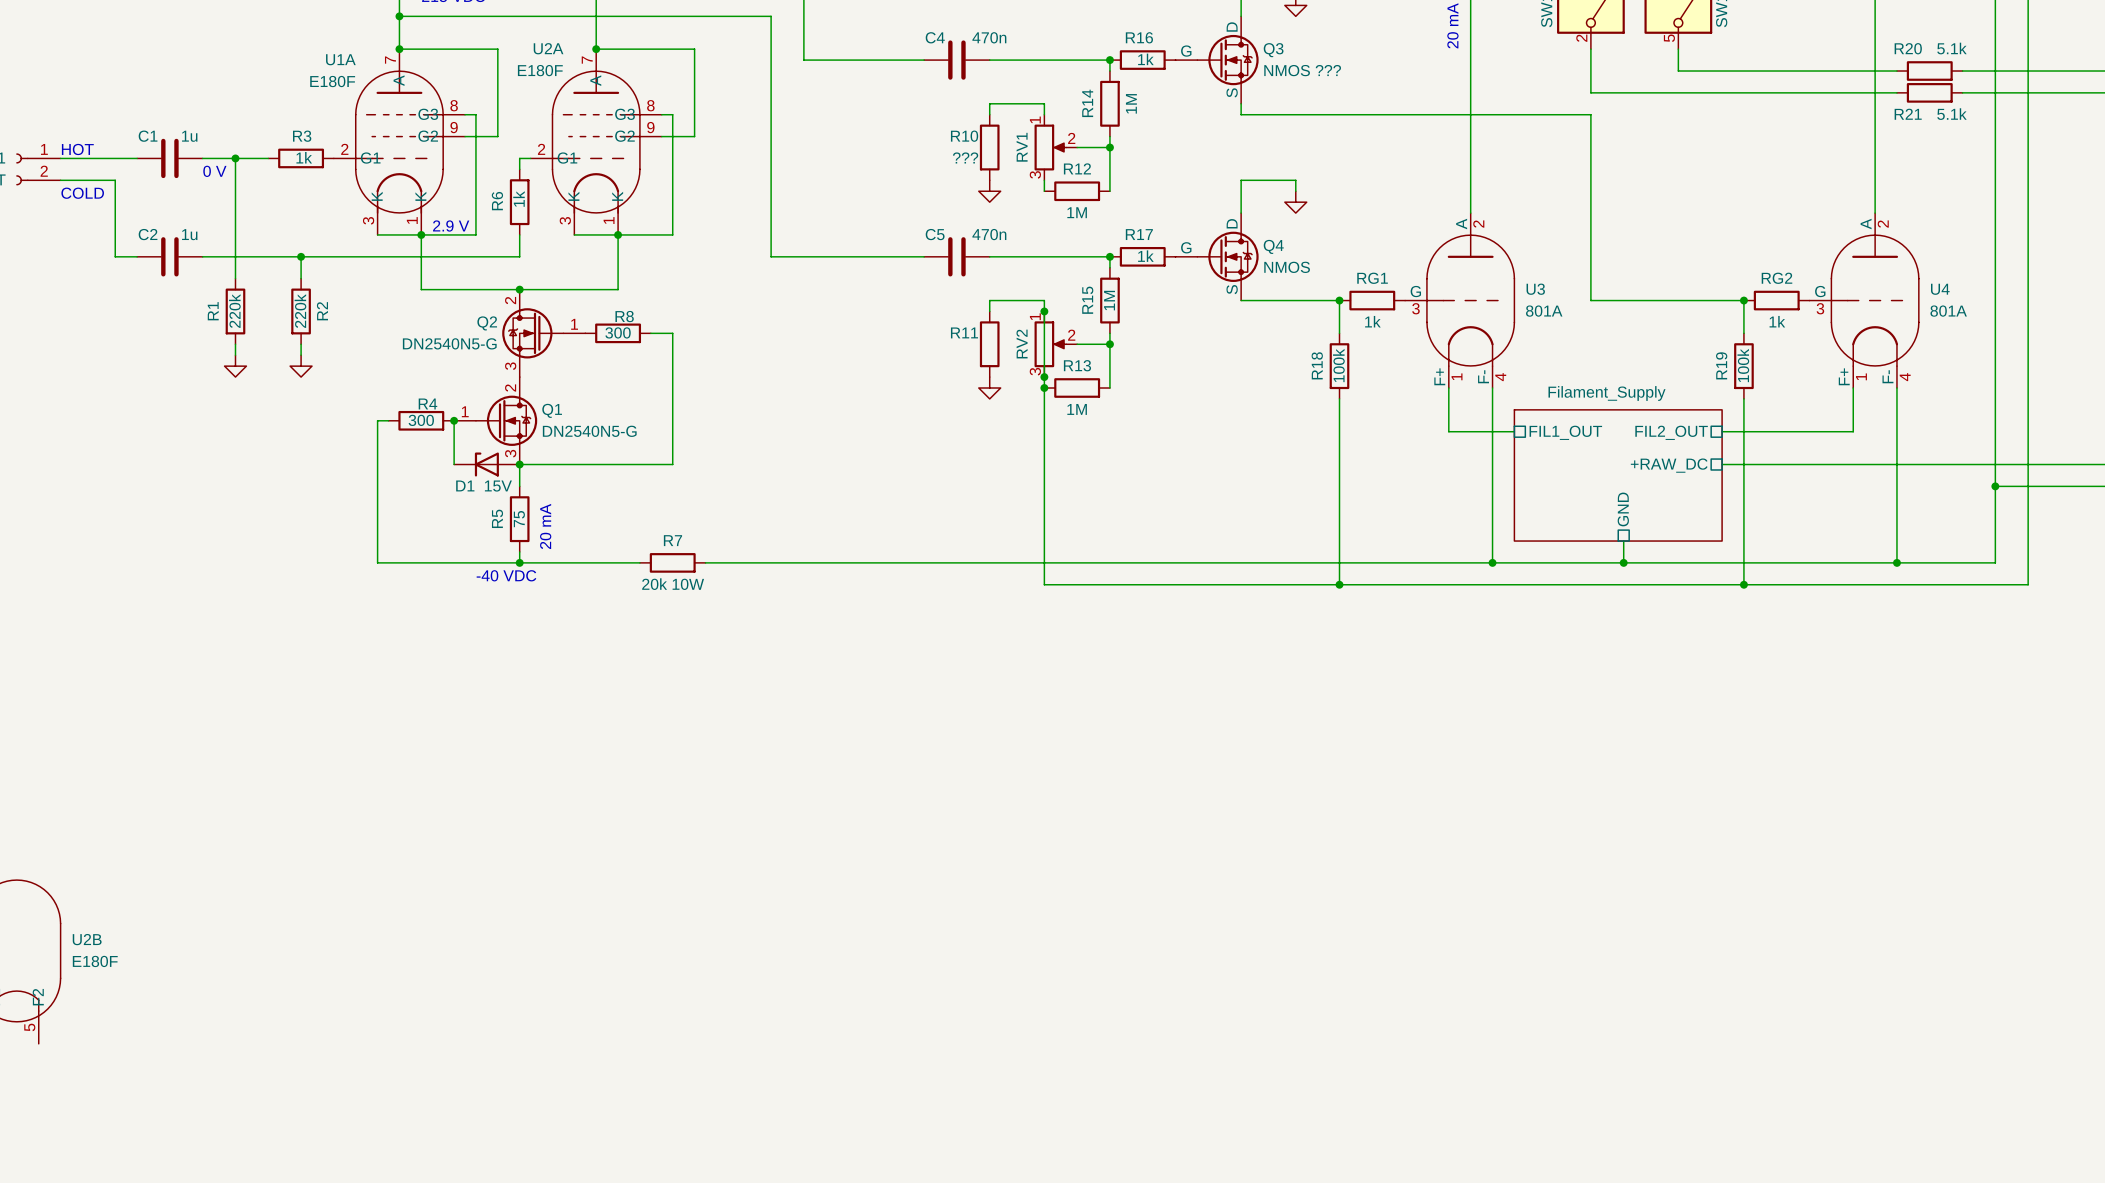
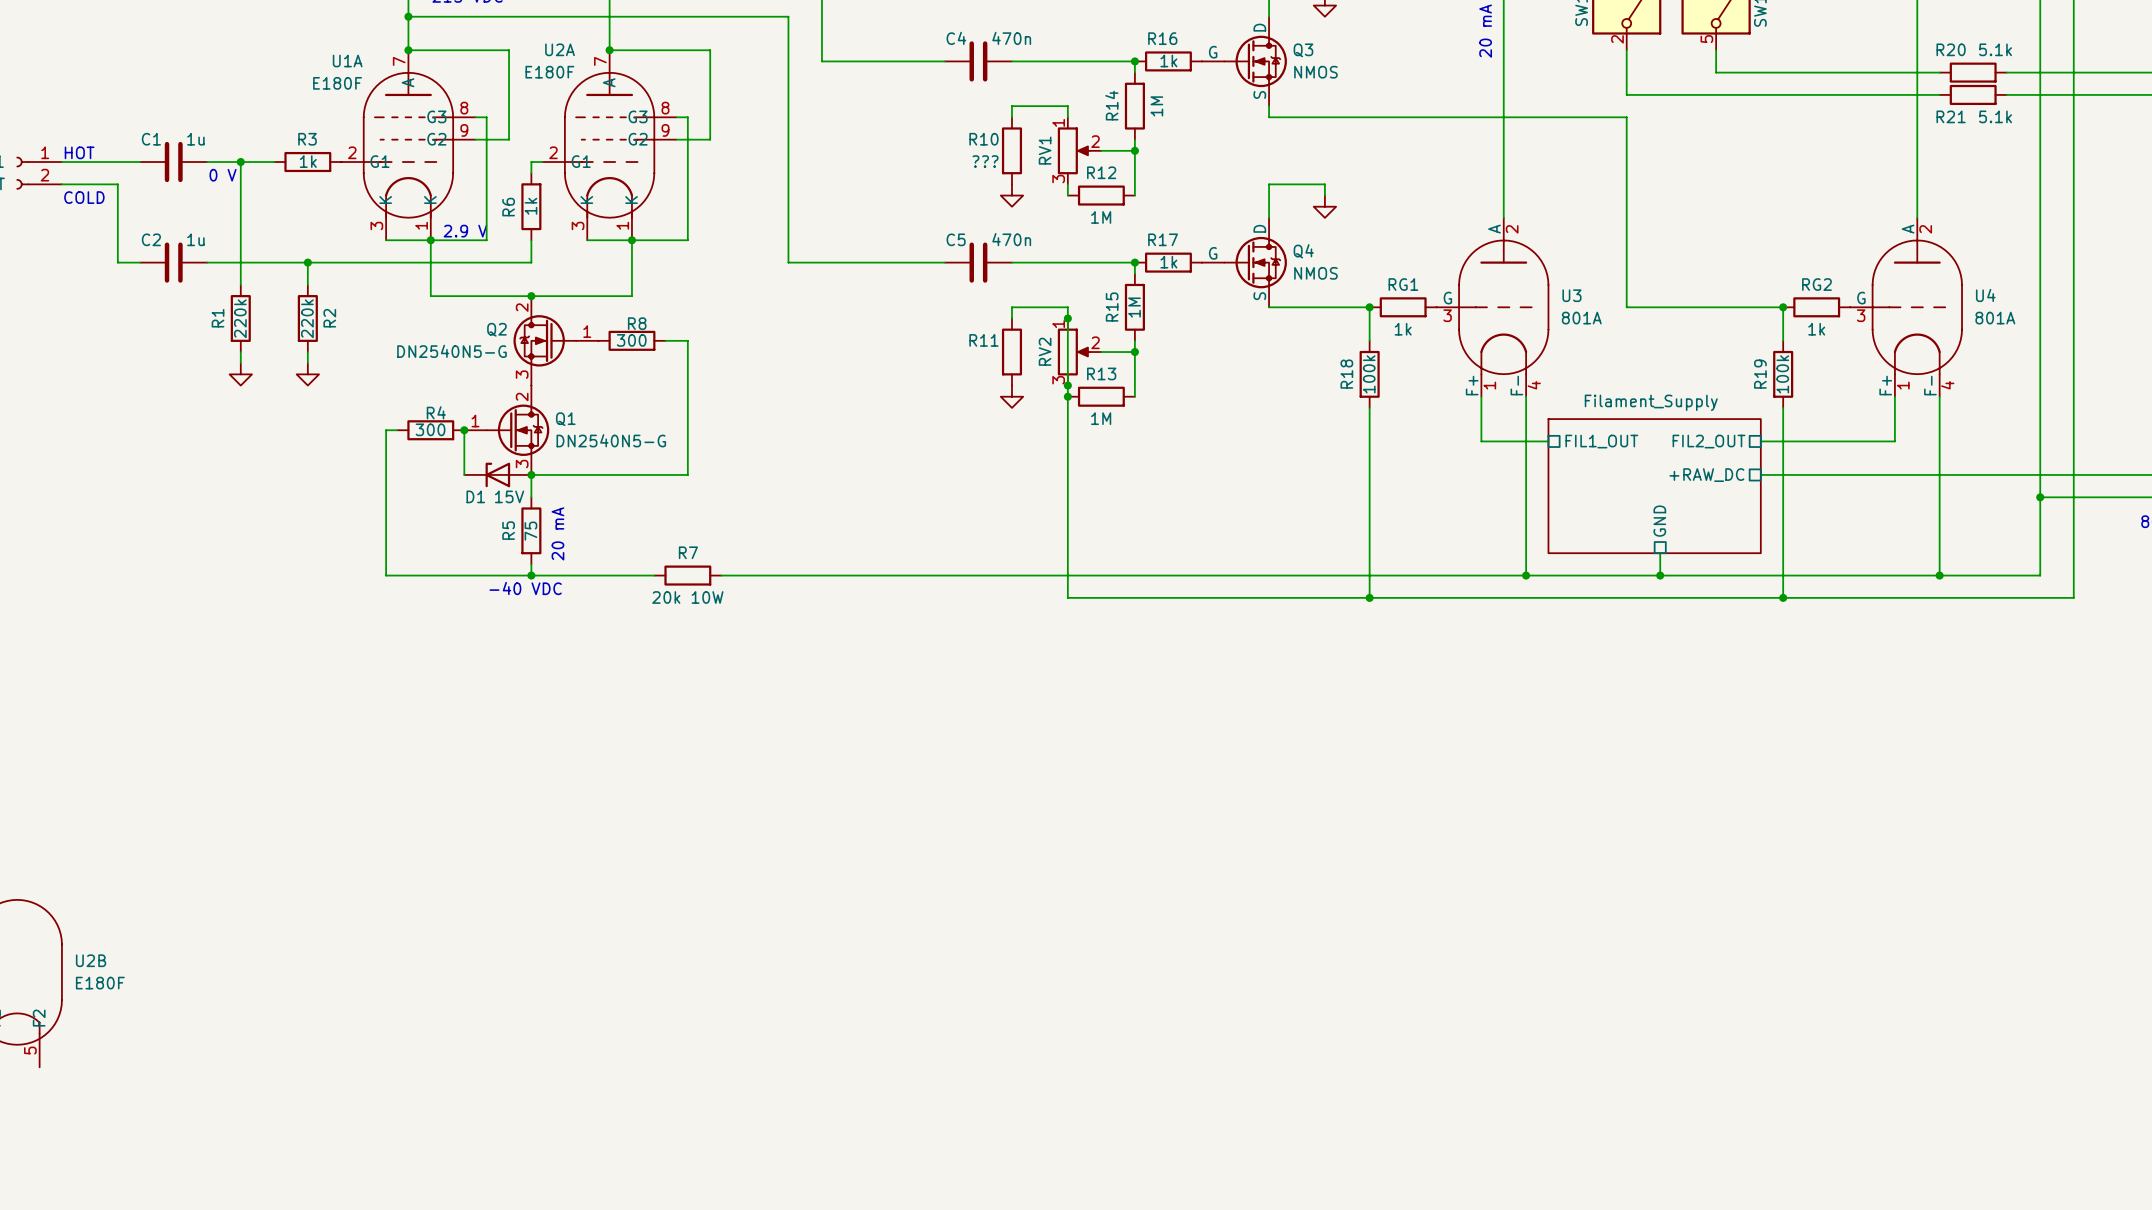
Q3 value: NMOS ??? (1302, 70) -> NMOS (1315, 72)

